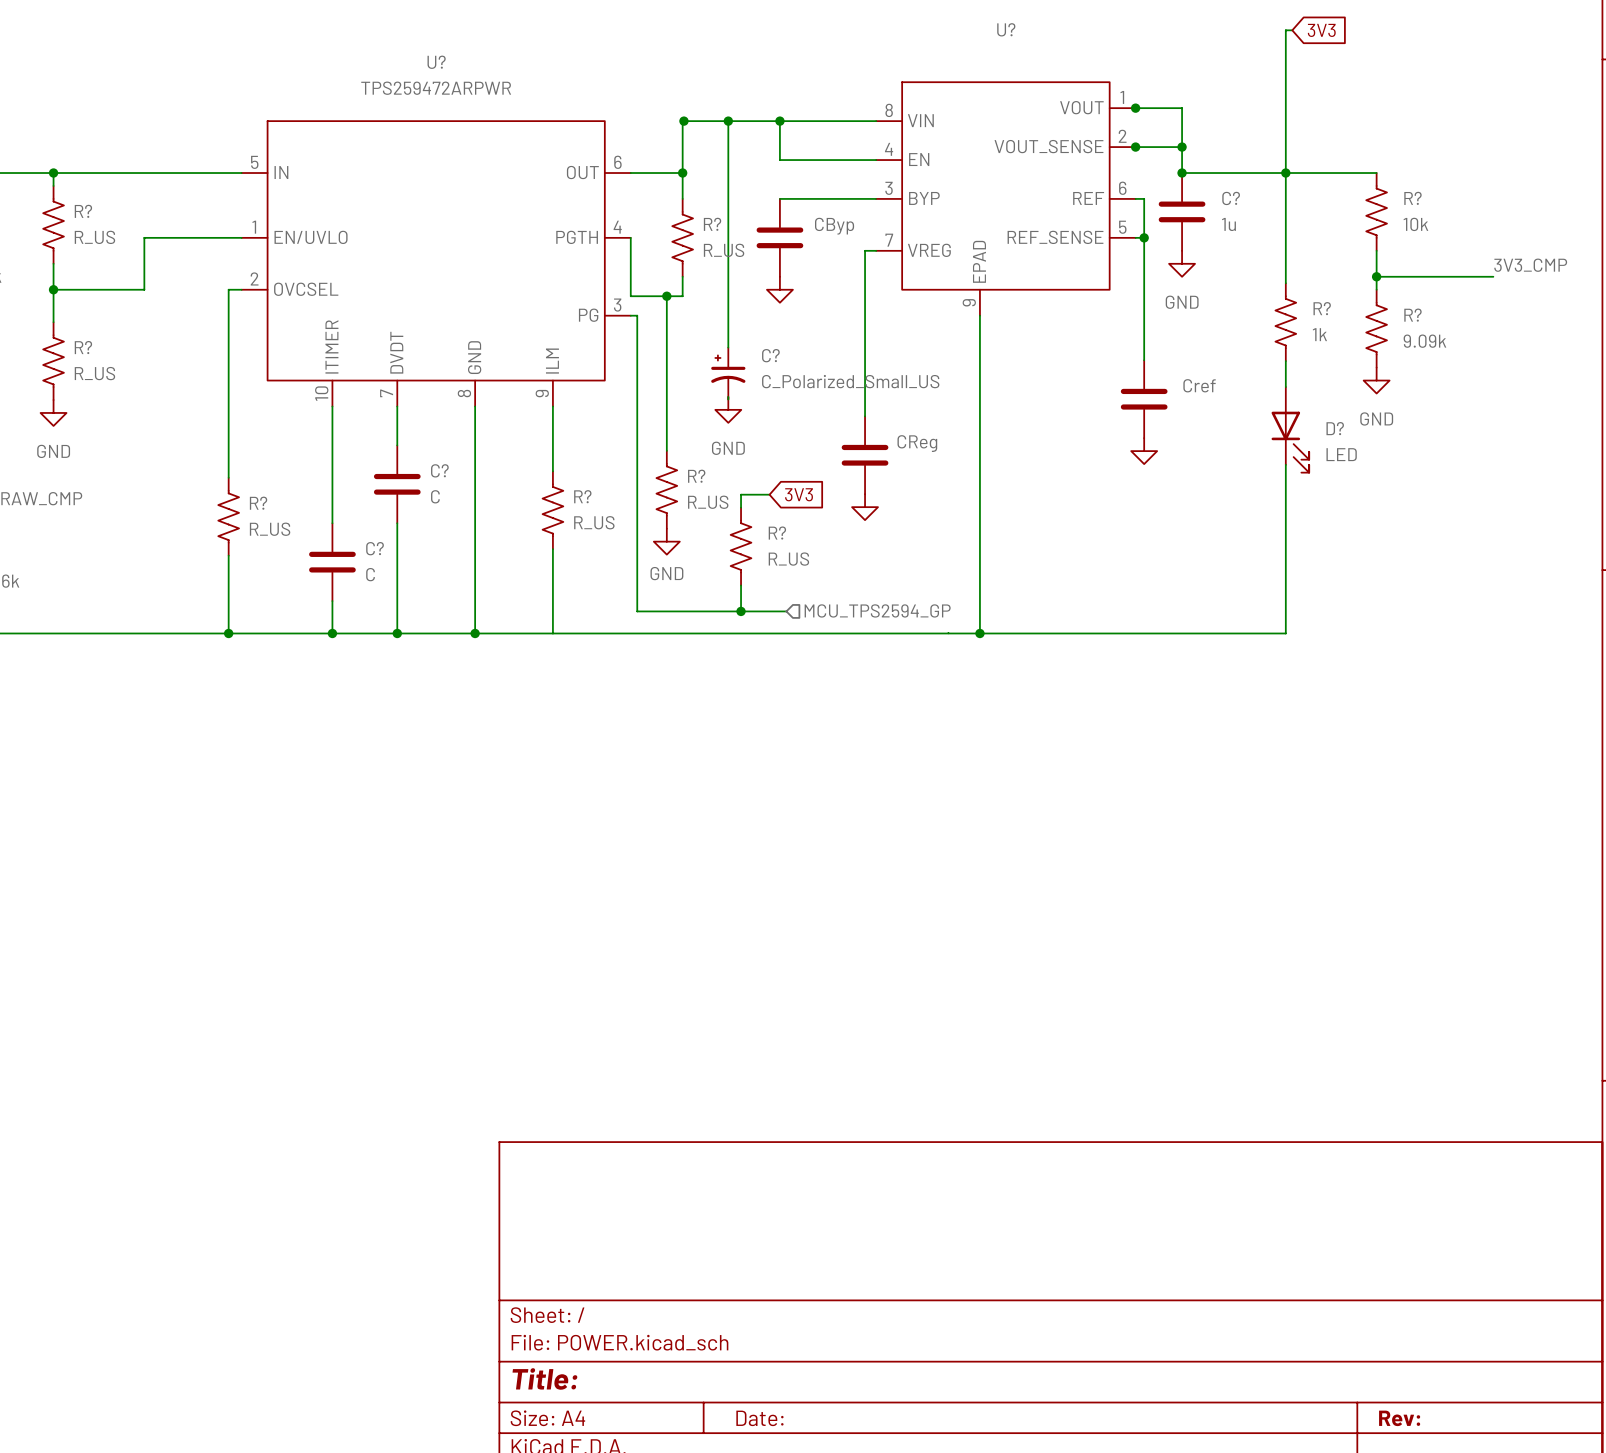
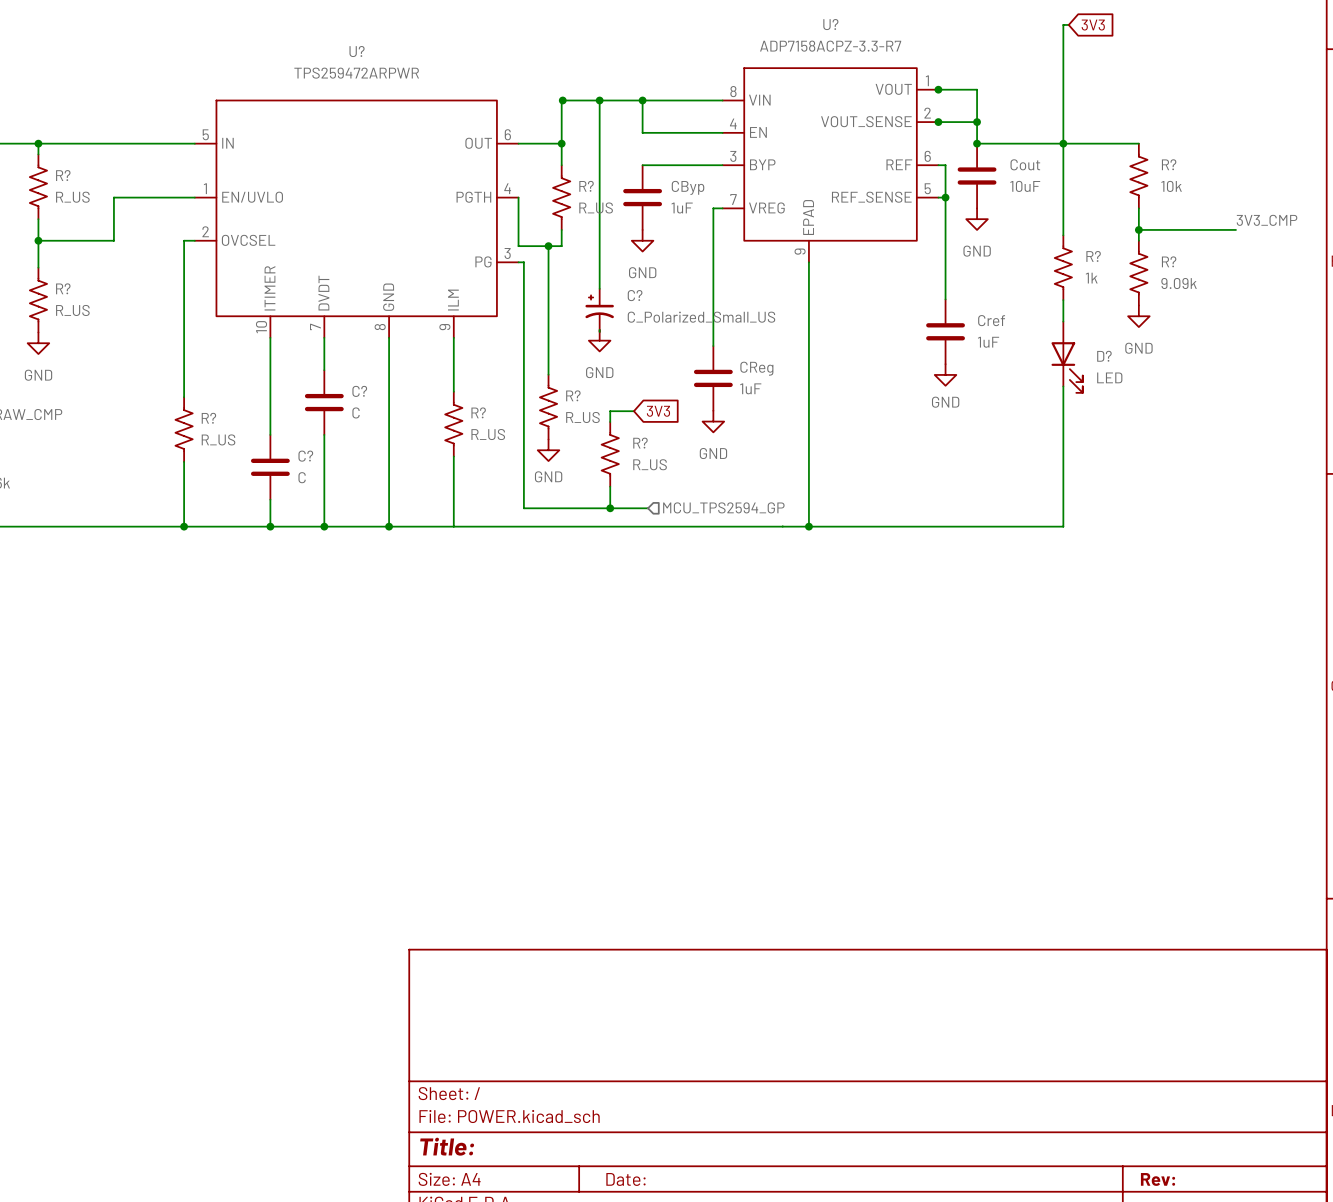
U? value: none -> ADP7158ACPZ-3.3-R7 (830, 46)
C? name: C? (1231, 198) -> Cout (1025, 164)
C? value: 1u (1228, 224) -> 10uF (1025, 186)
CByp value: none -> 1uF (682, 208)
power symbol text: none -> GND (642, 272)
Cref value: none -> 1uF (988, 342)
CReg value: none -> 1uF (750, 388)
power symbol text: none -> GND (945, 402)
power symbol text: none -> GND (713, 453)

